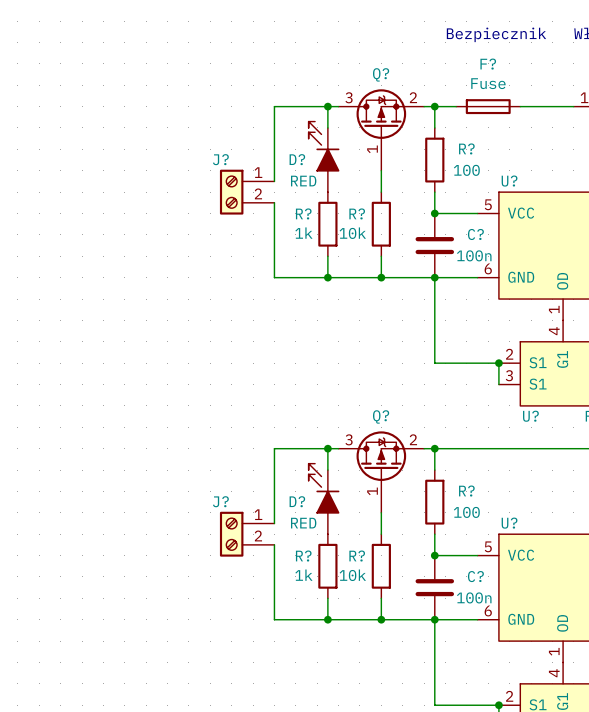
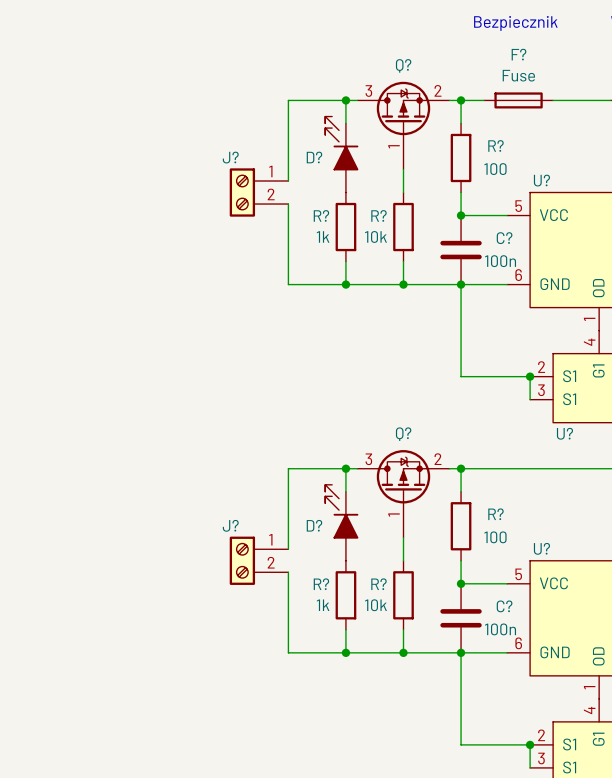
D? value: RED (303, 181) -> none
D? value: RED (303, 523) -> none

